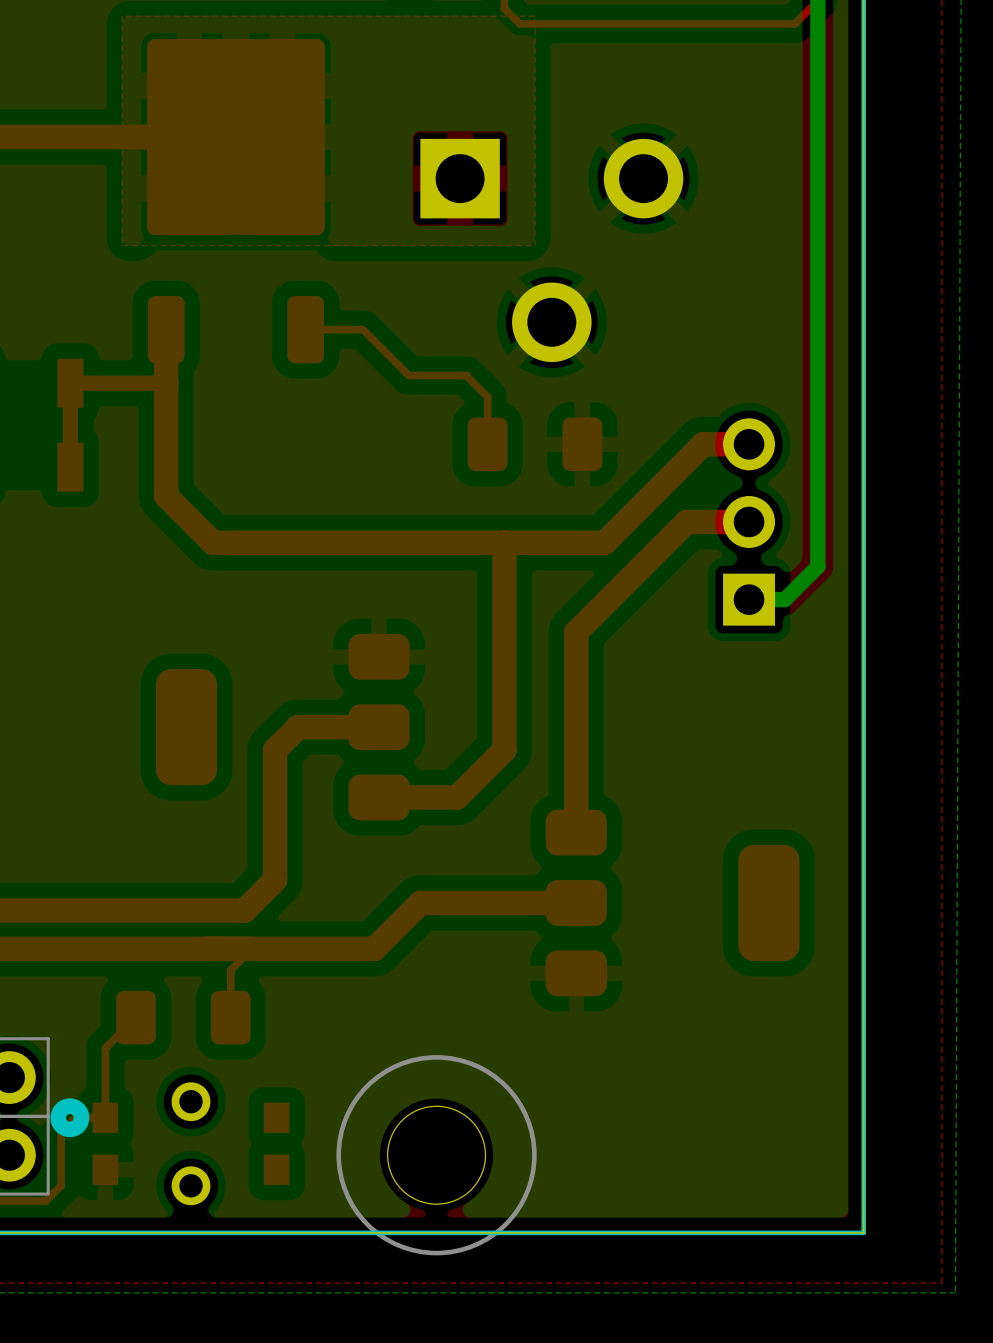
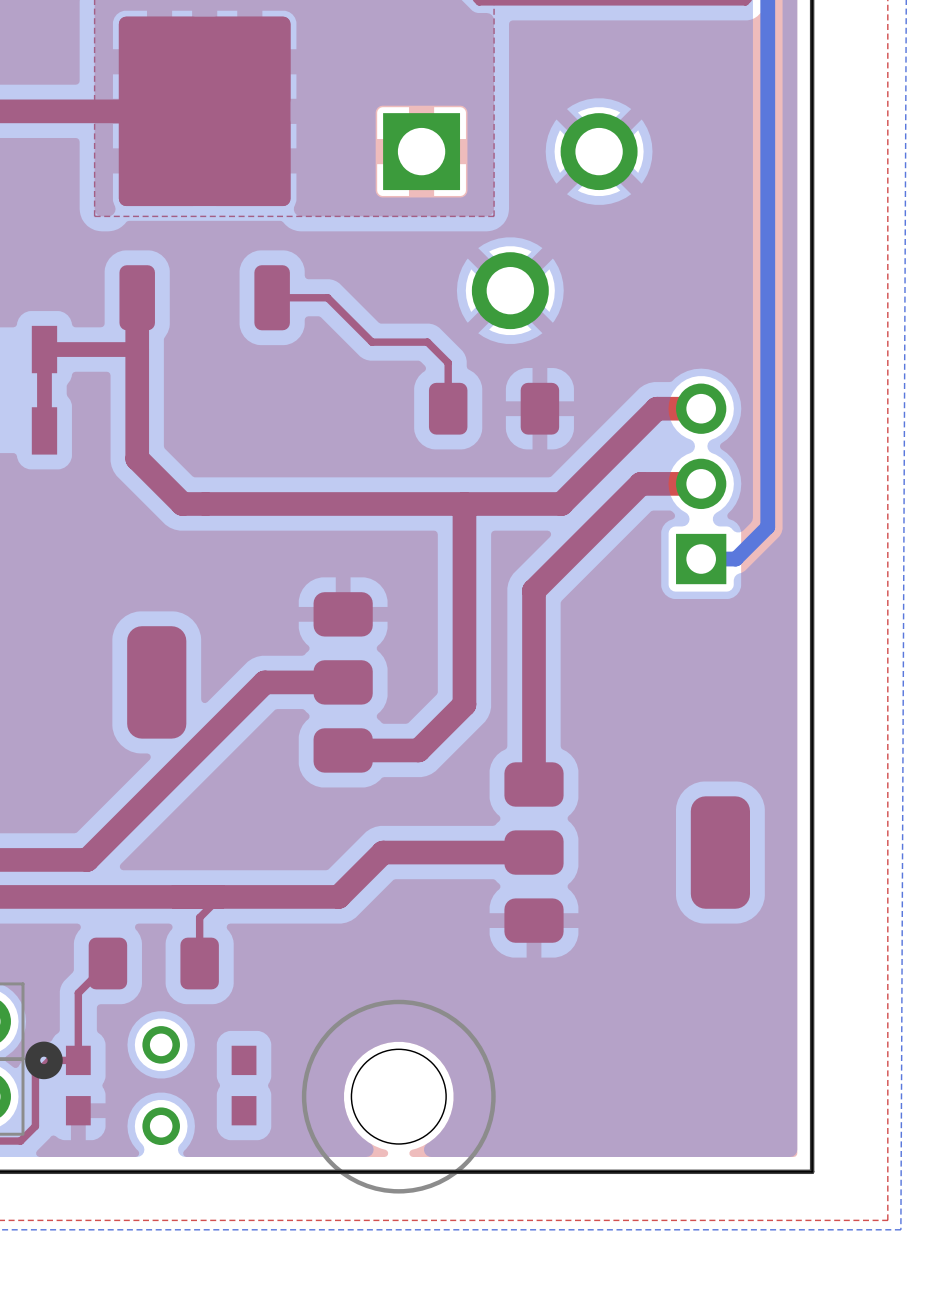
top track: (275, 750) (275, 880) (244, 910) (114, 910) -> (242, 704) (87, 859)

